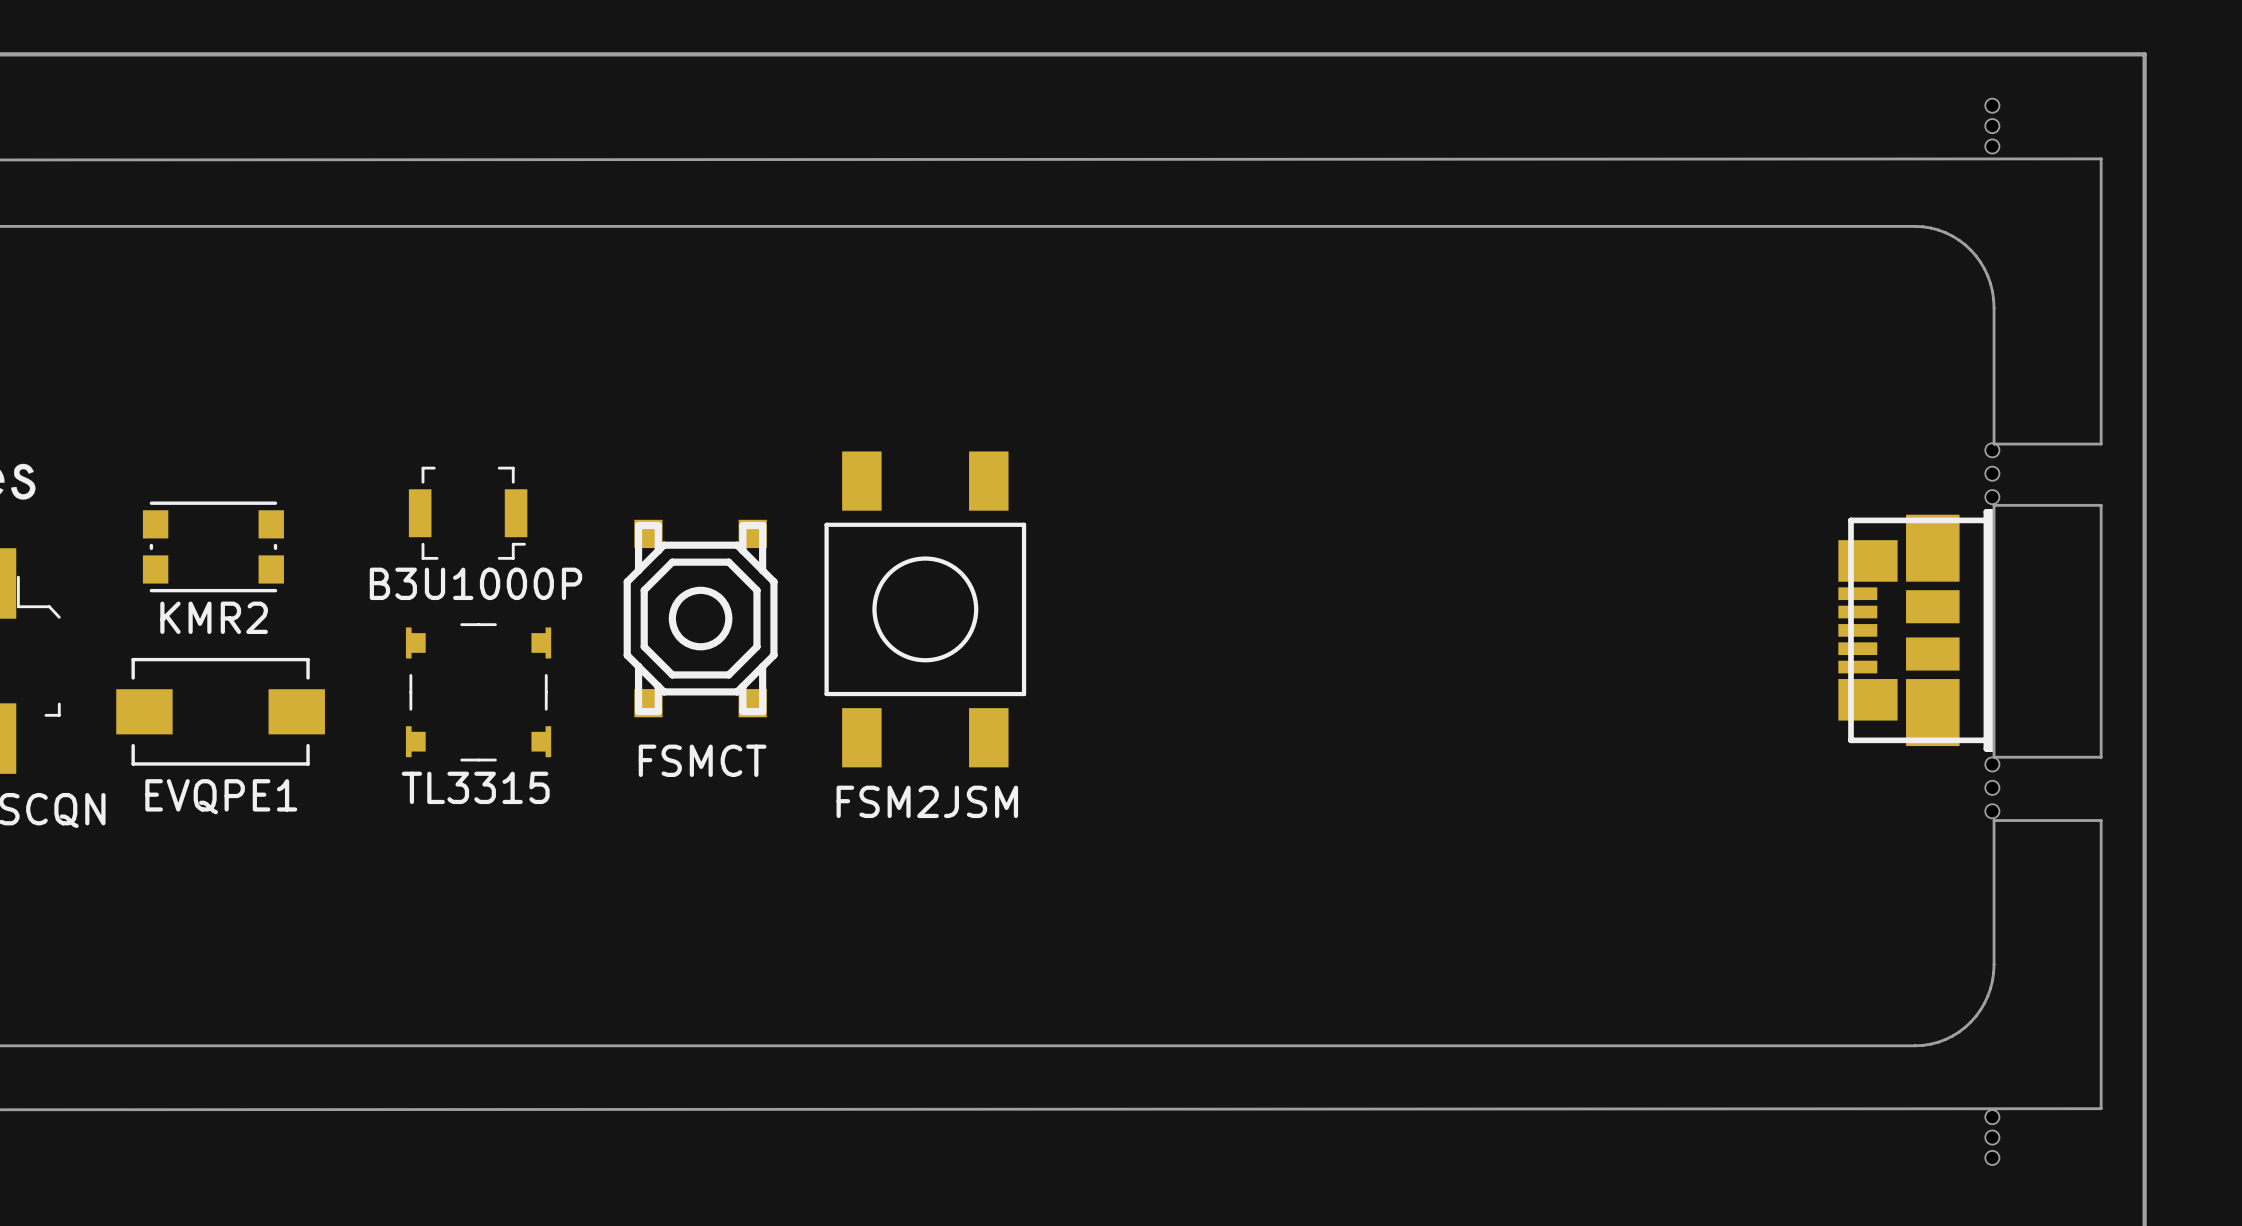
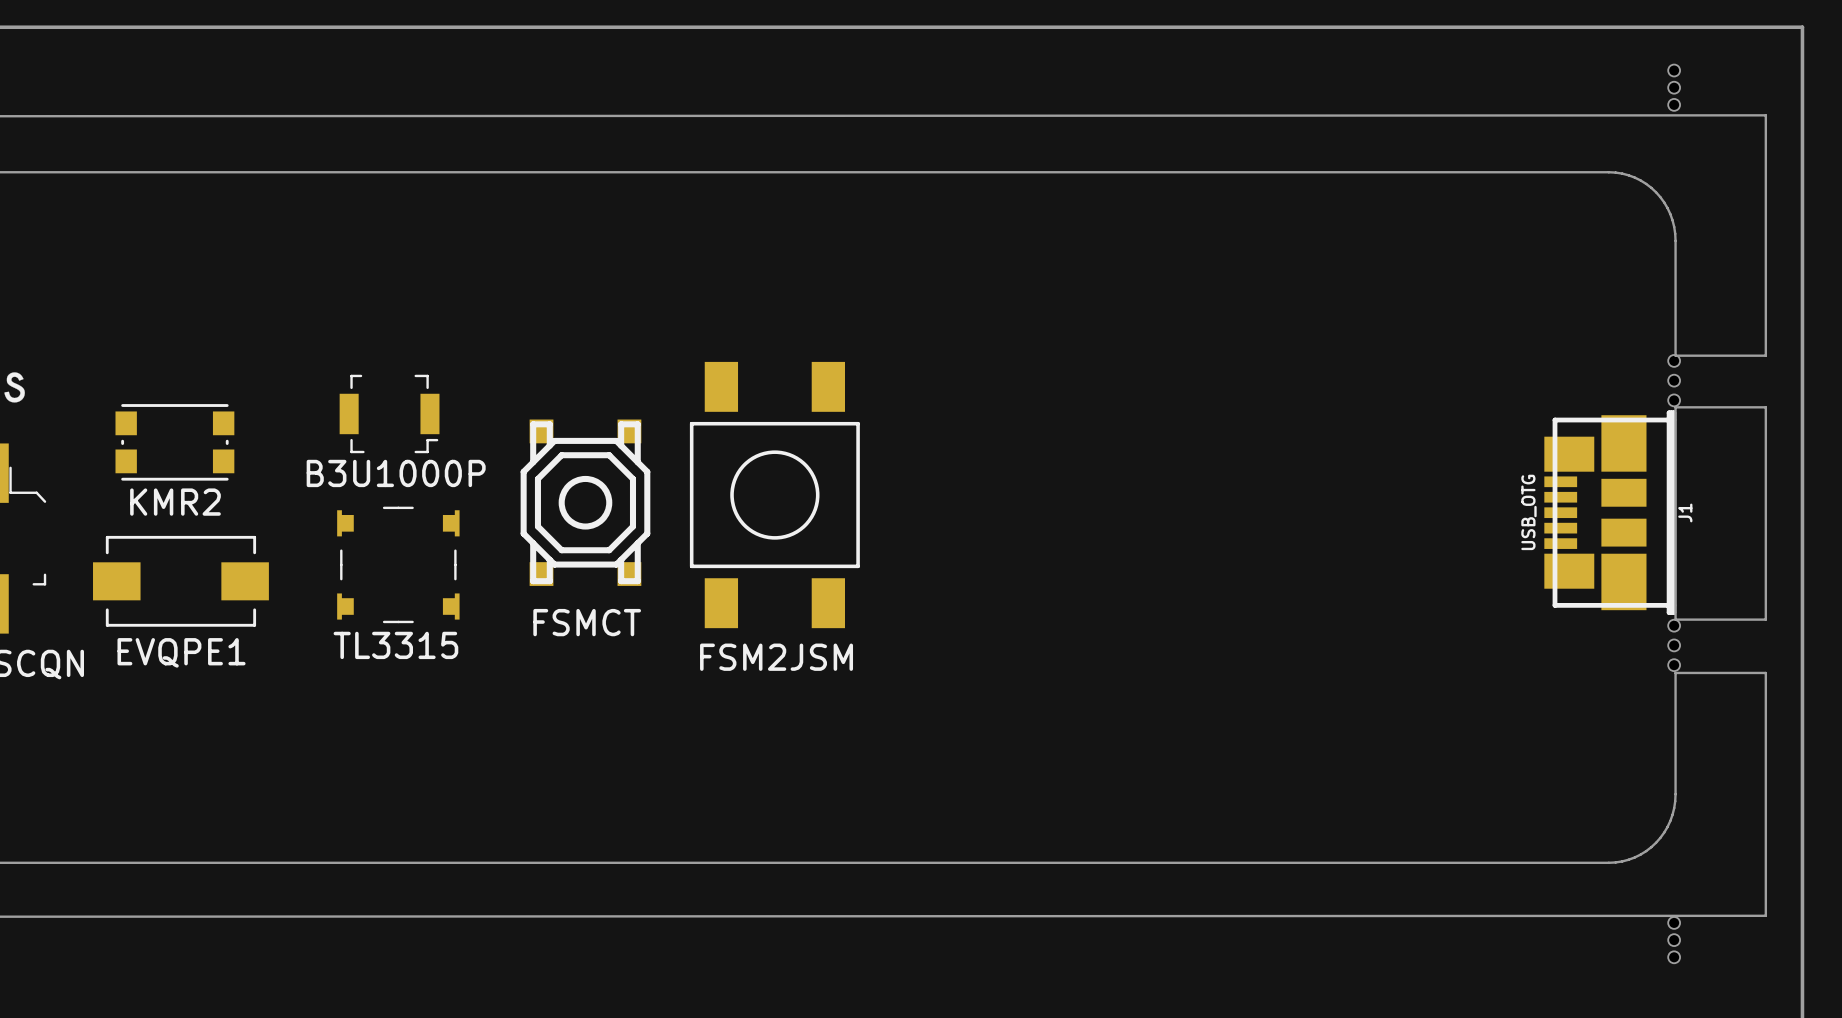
J1 value: none -> USB_OTG (1528, 512)
J1 name: none -> J1 (1685, 512)

